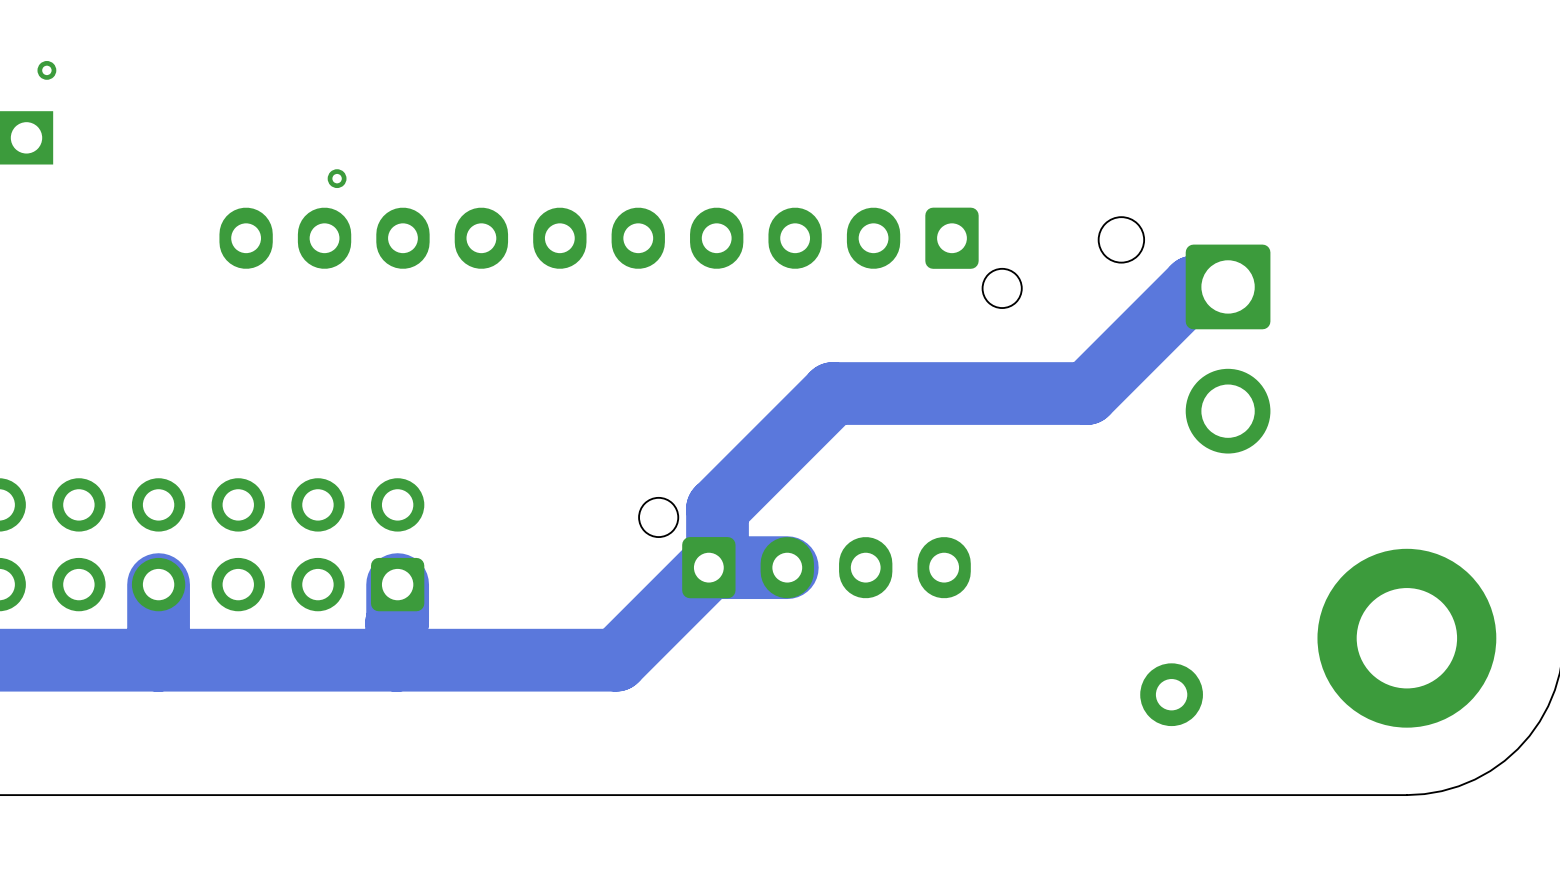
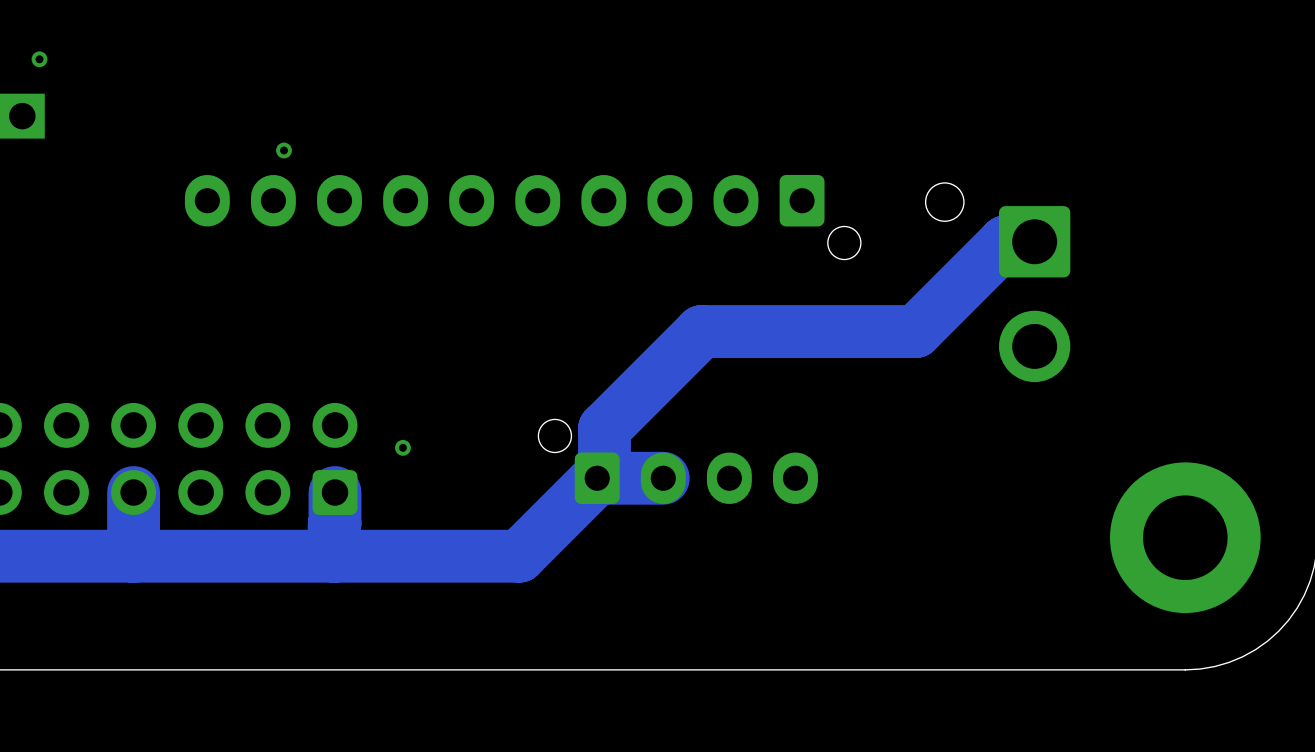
via: none -> (402, 447)
part: (1171, 694) -> none

